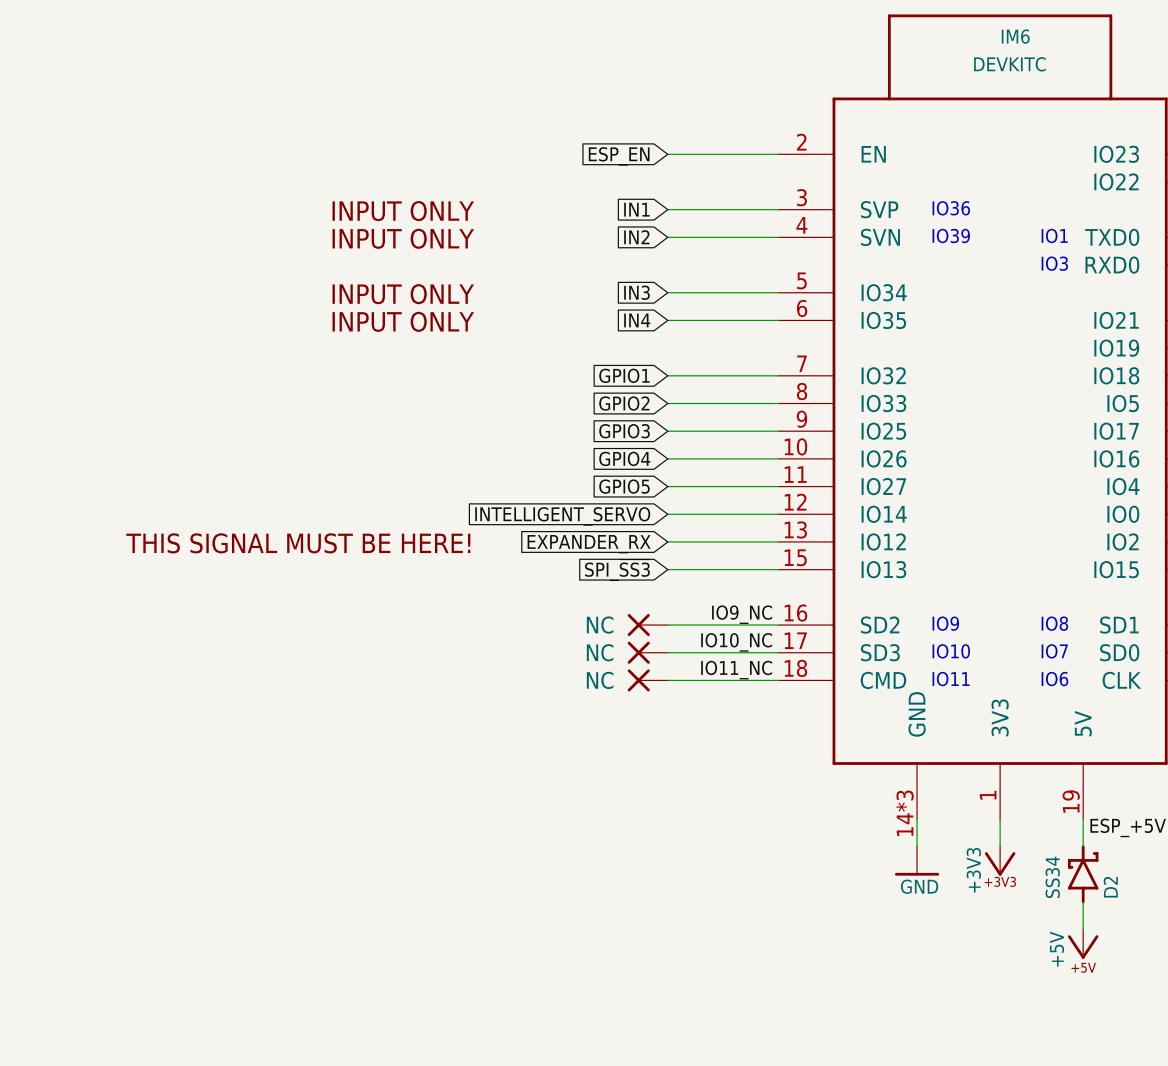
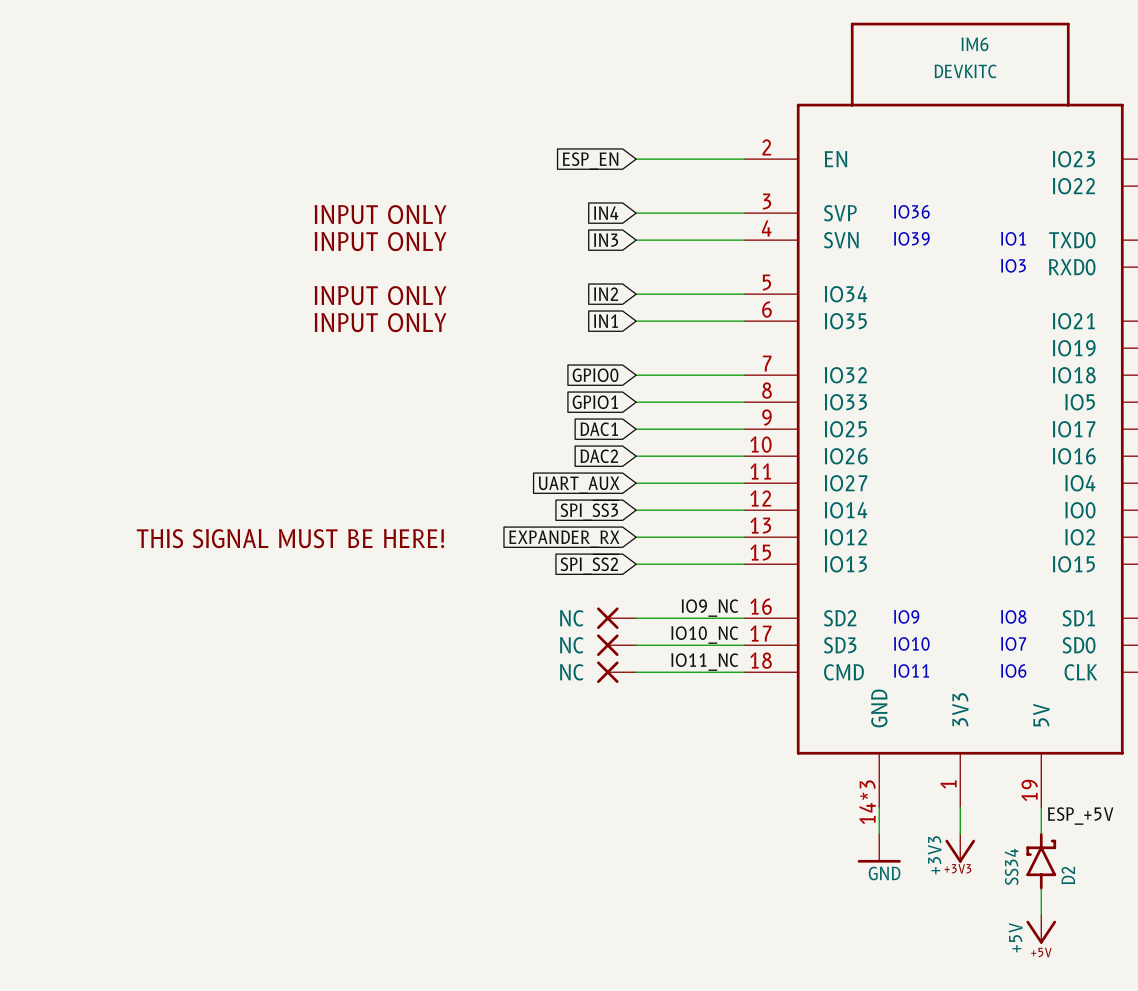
global label: IN1 (636, 209) -> IN4 (606, 213)
global label: IN2 (636, 237) -> IN3 (606, 240)
global label: IN3 (637, 292) -> IN2 (606, 294)
global label: IN4 (637, 320) -> IN1 (606, 321)
global label: GPIO1 (624, 375) -> GPIO0 (595, 375)
global label: GPIO2 (624, 403) -> GPIO1 (595, 402)
global label: GPIO3 (624, 431) -> DAC1 (599, 429)
global label: GPIO4 (624, 458) -> DAC2 (599, 456)
global label: GPIO5 (624, 486) -> UART_AUX (579, 485)
global label: INTELLIGENT_SERVO (562, 516) -> SPI_~{SS3} (589, 510)
global label: SPI_~{SS3} (617, 570) -> SPI_~{SS2} (589, 564)

